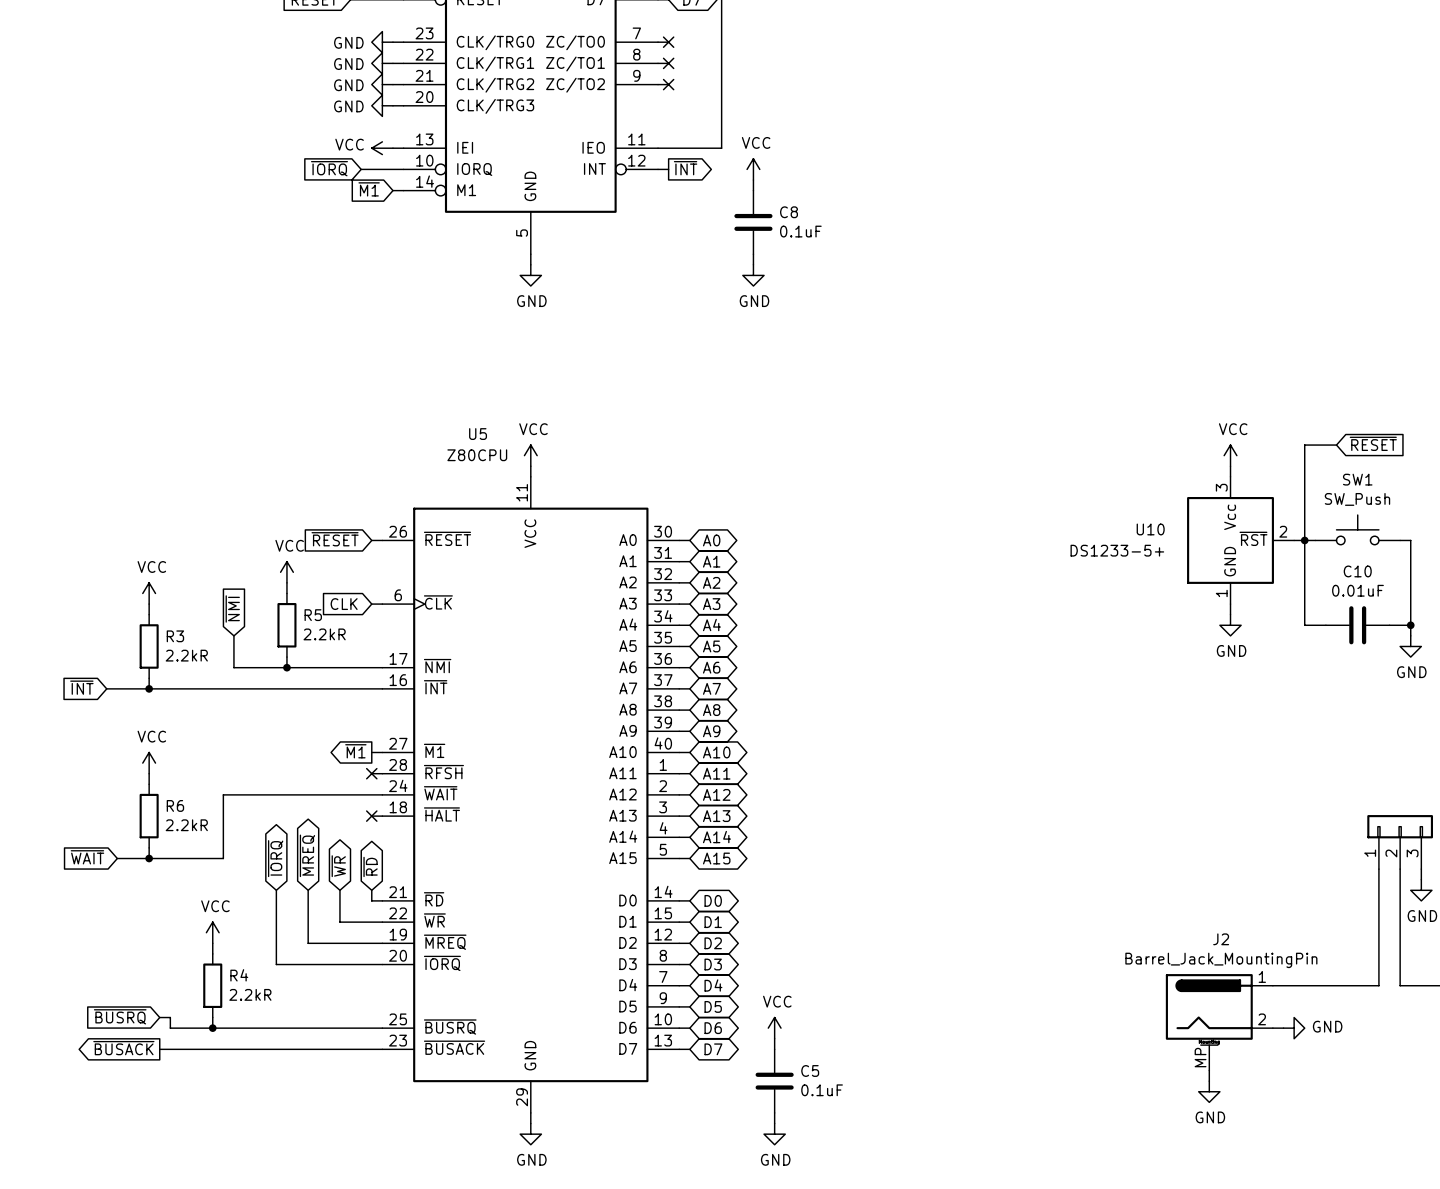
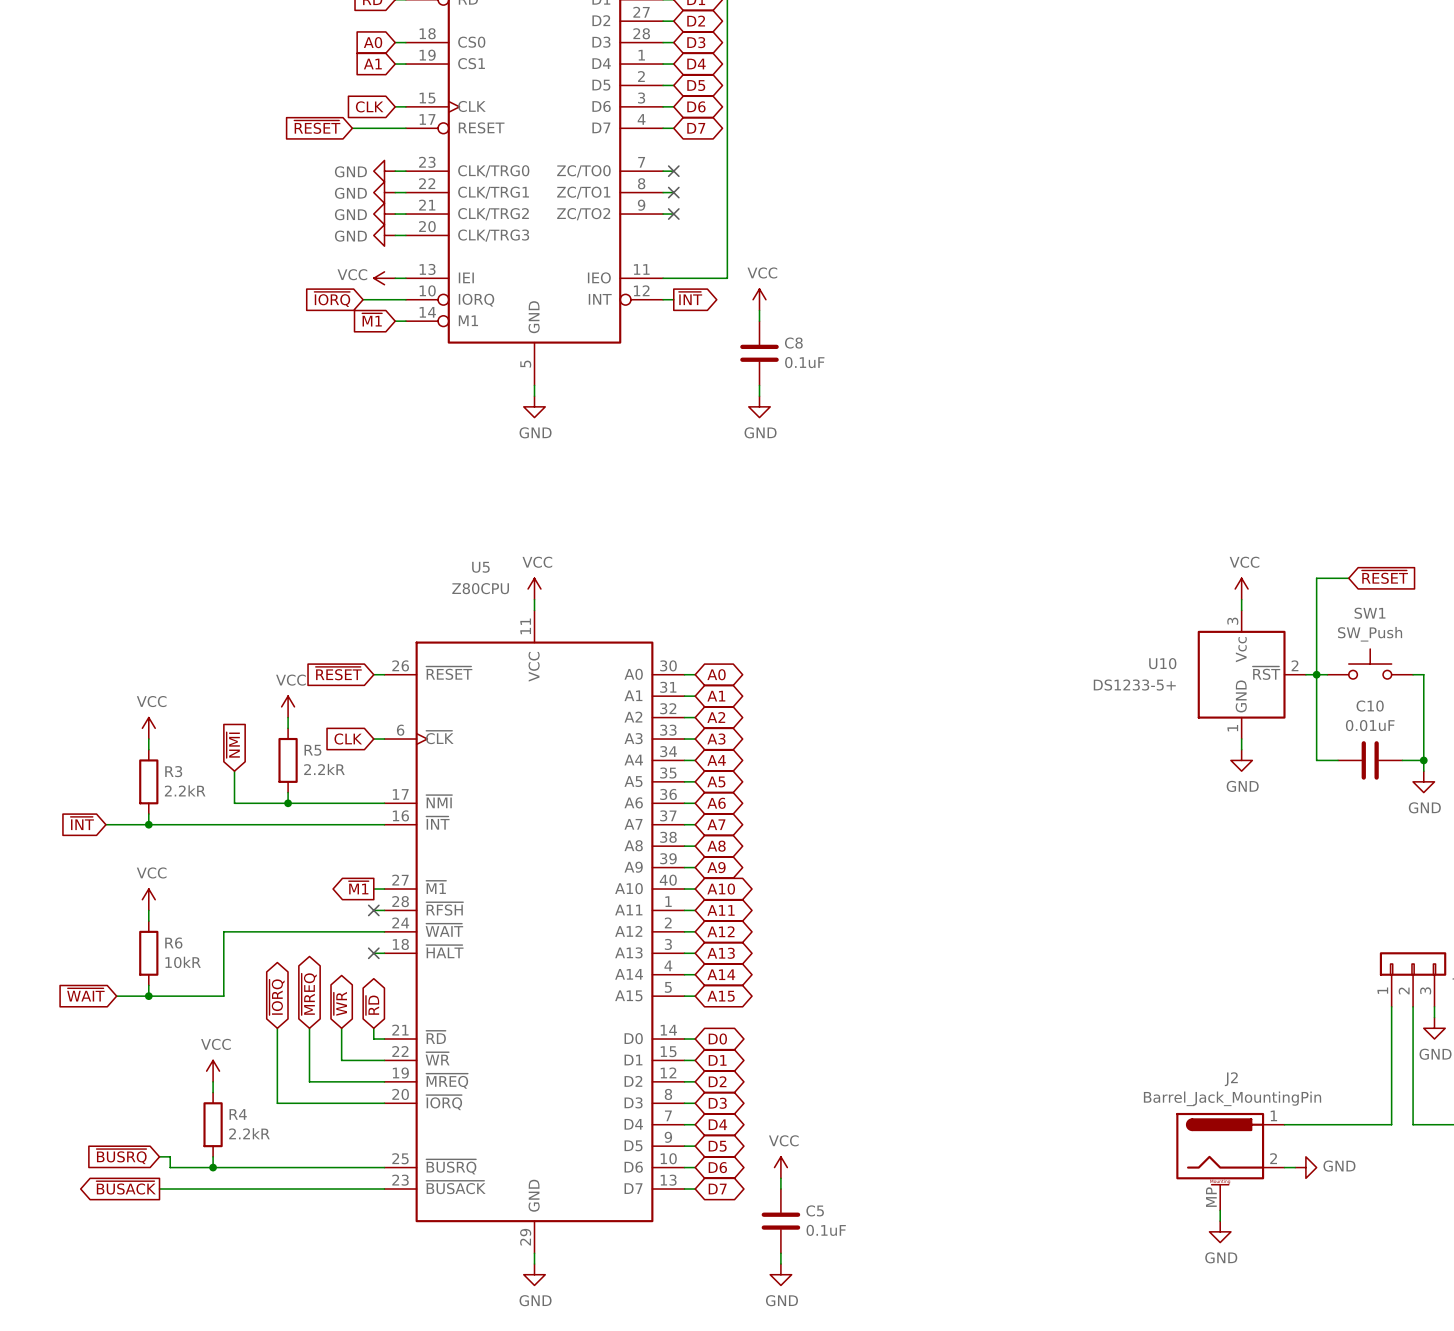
R6 value: 2.2kR (186, 825) -> 10kR (183, 962)

